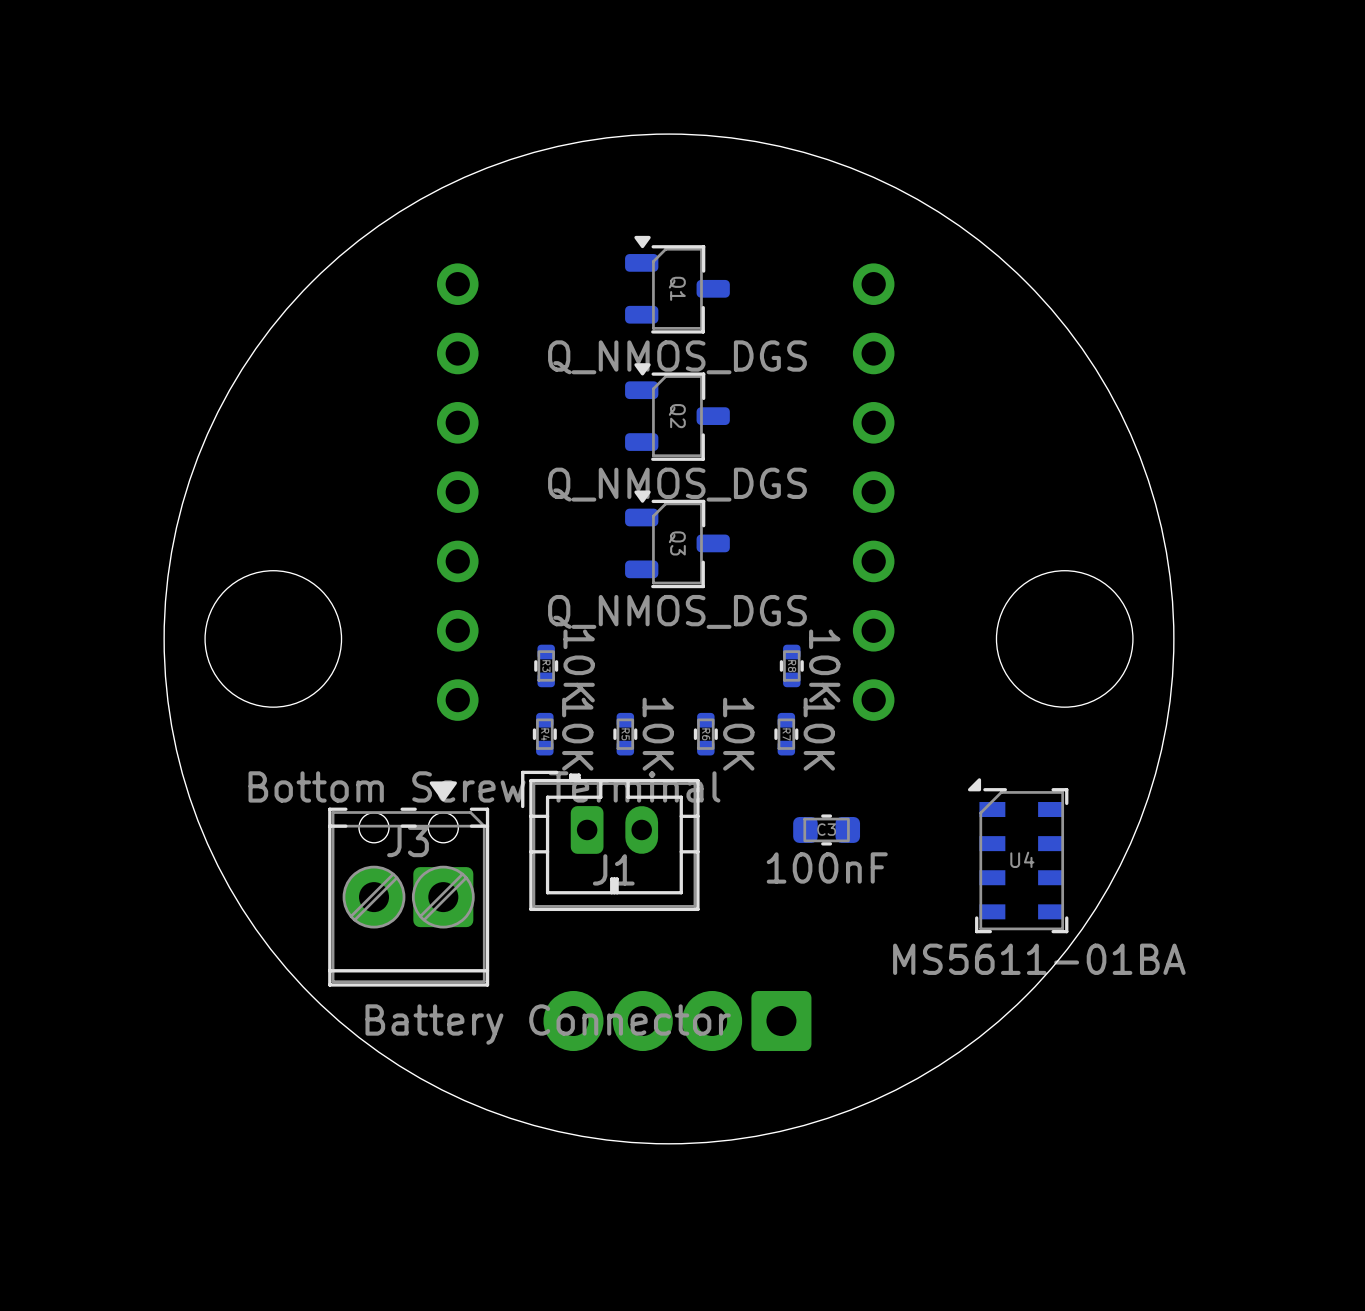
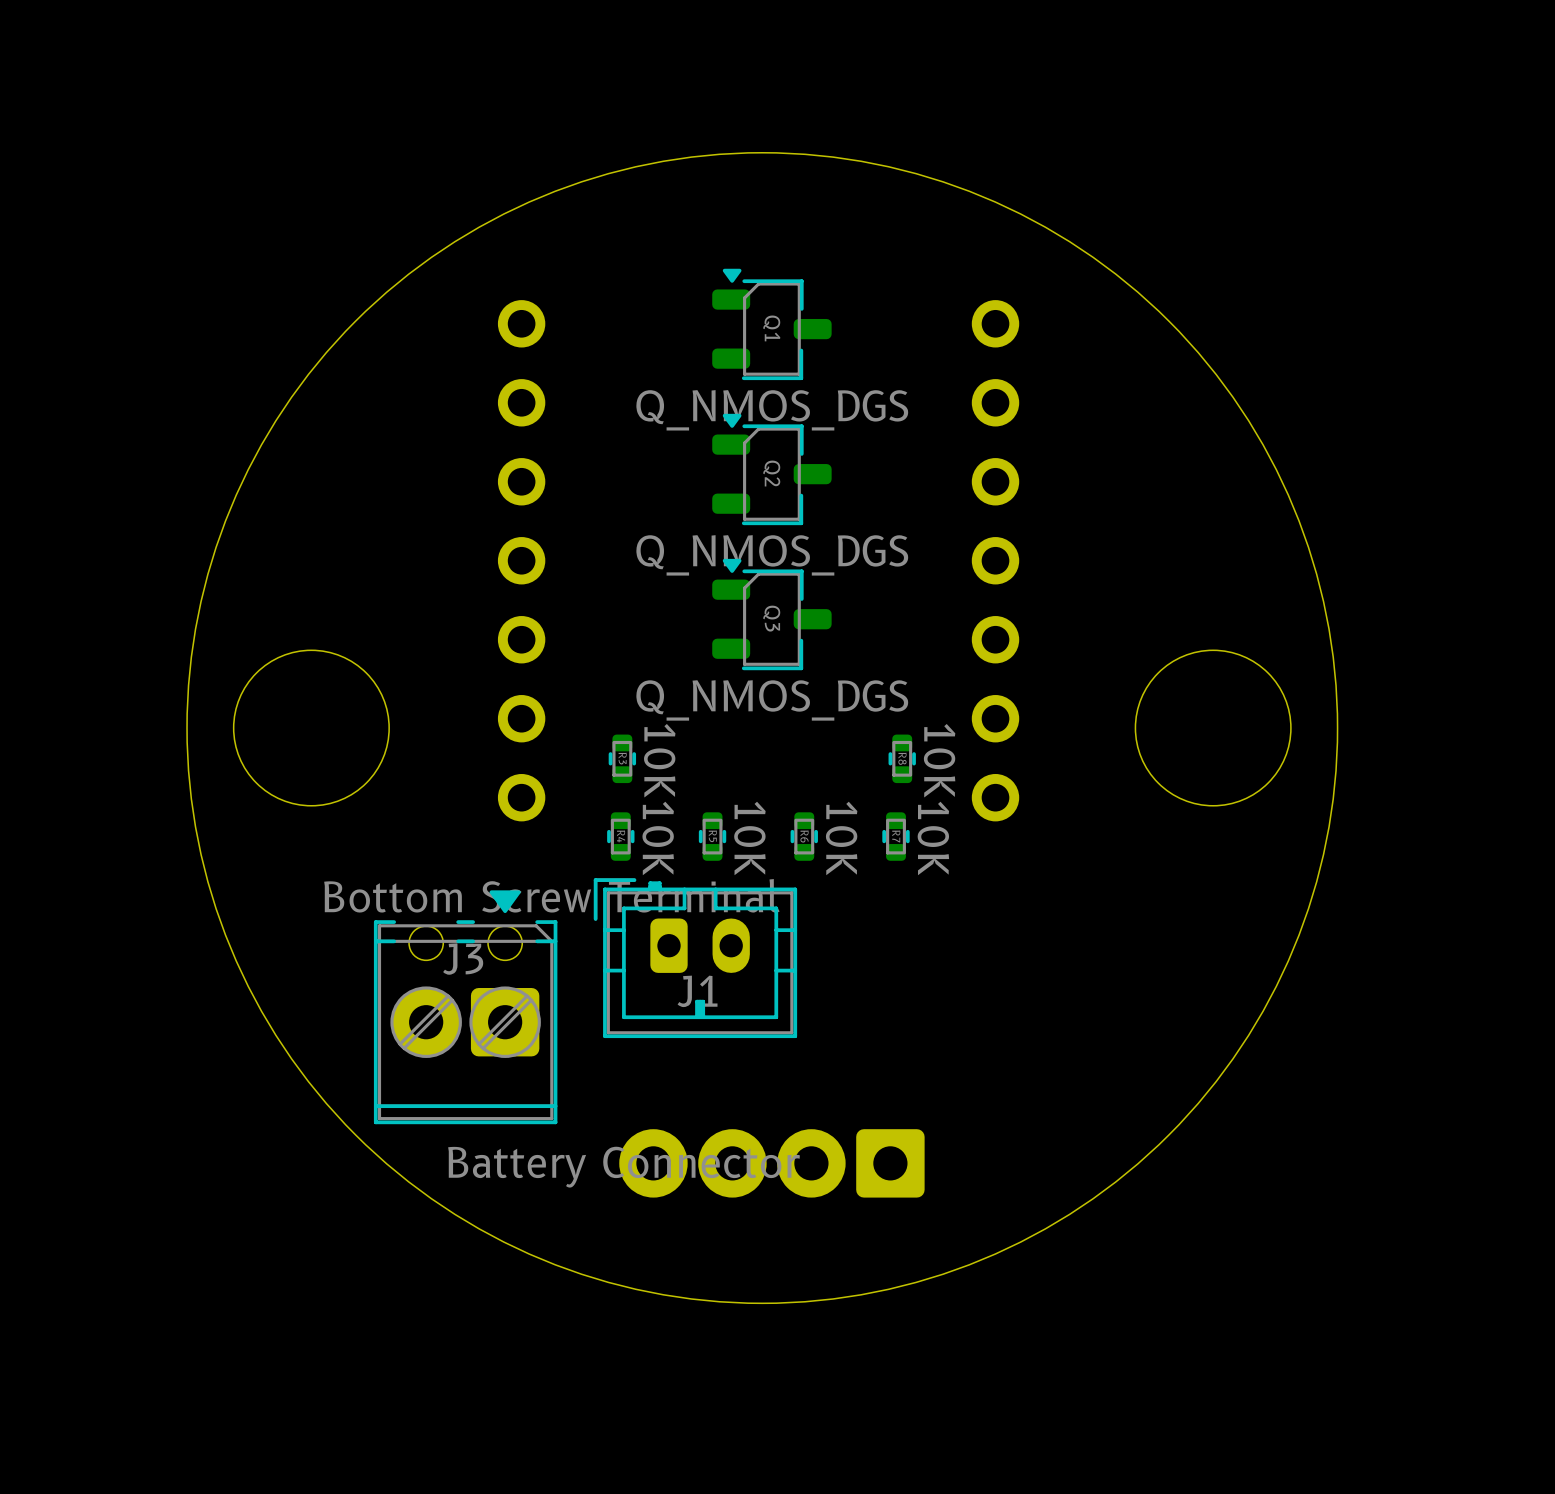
C3: 100nF (826, 829) -> none
U4: MS5611-01BA (1018, 855) -> none

